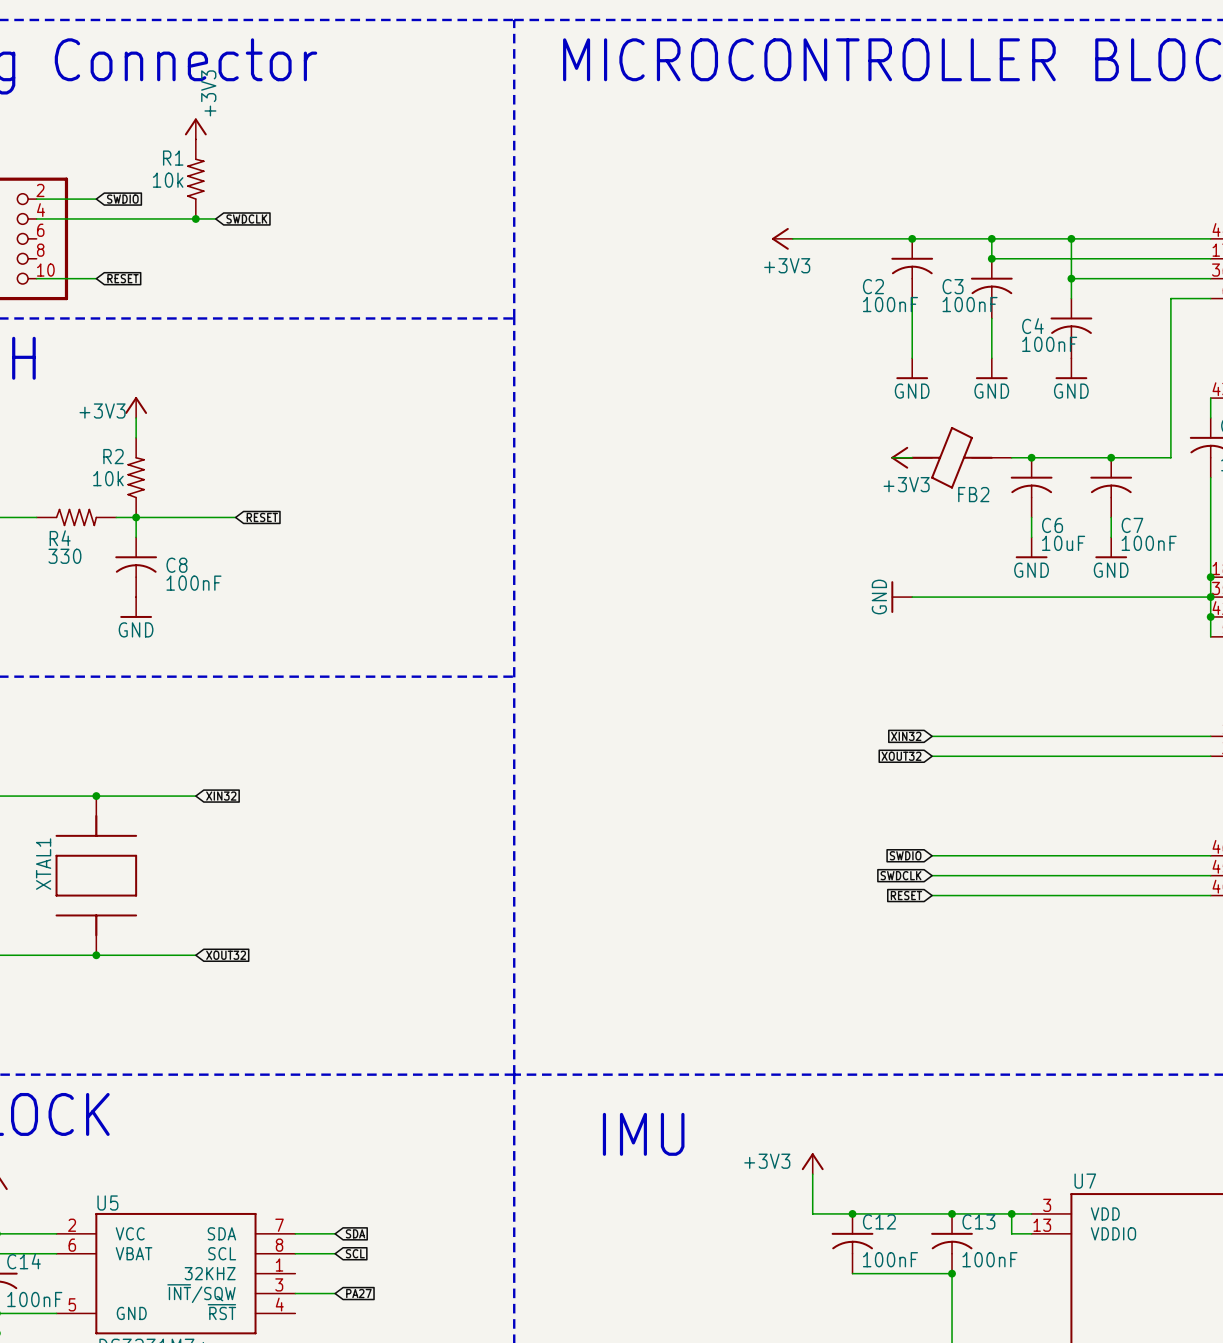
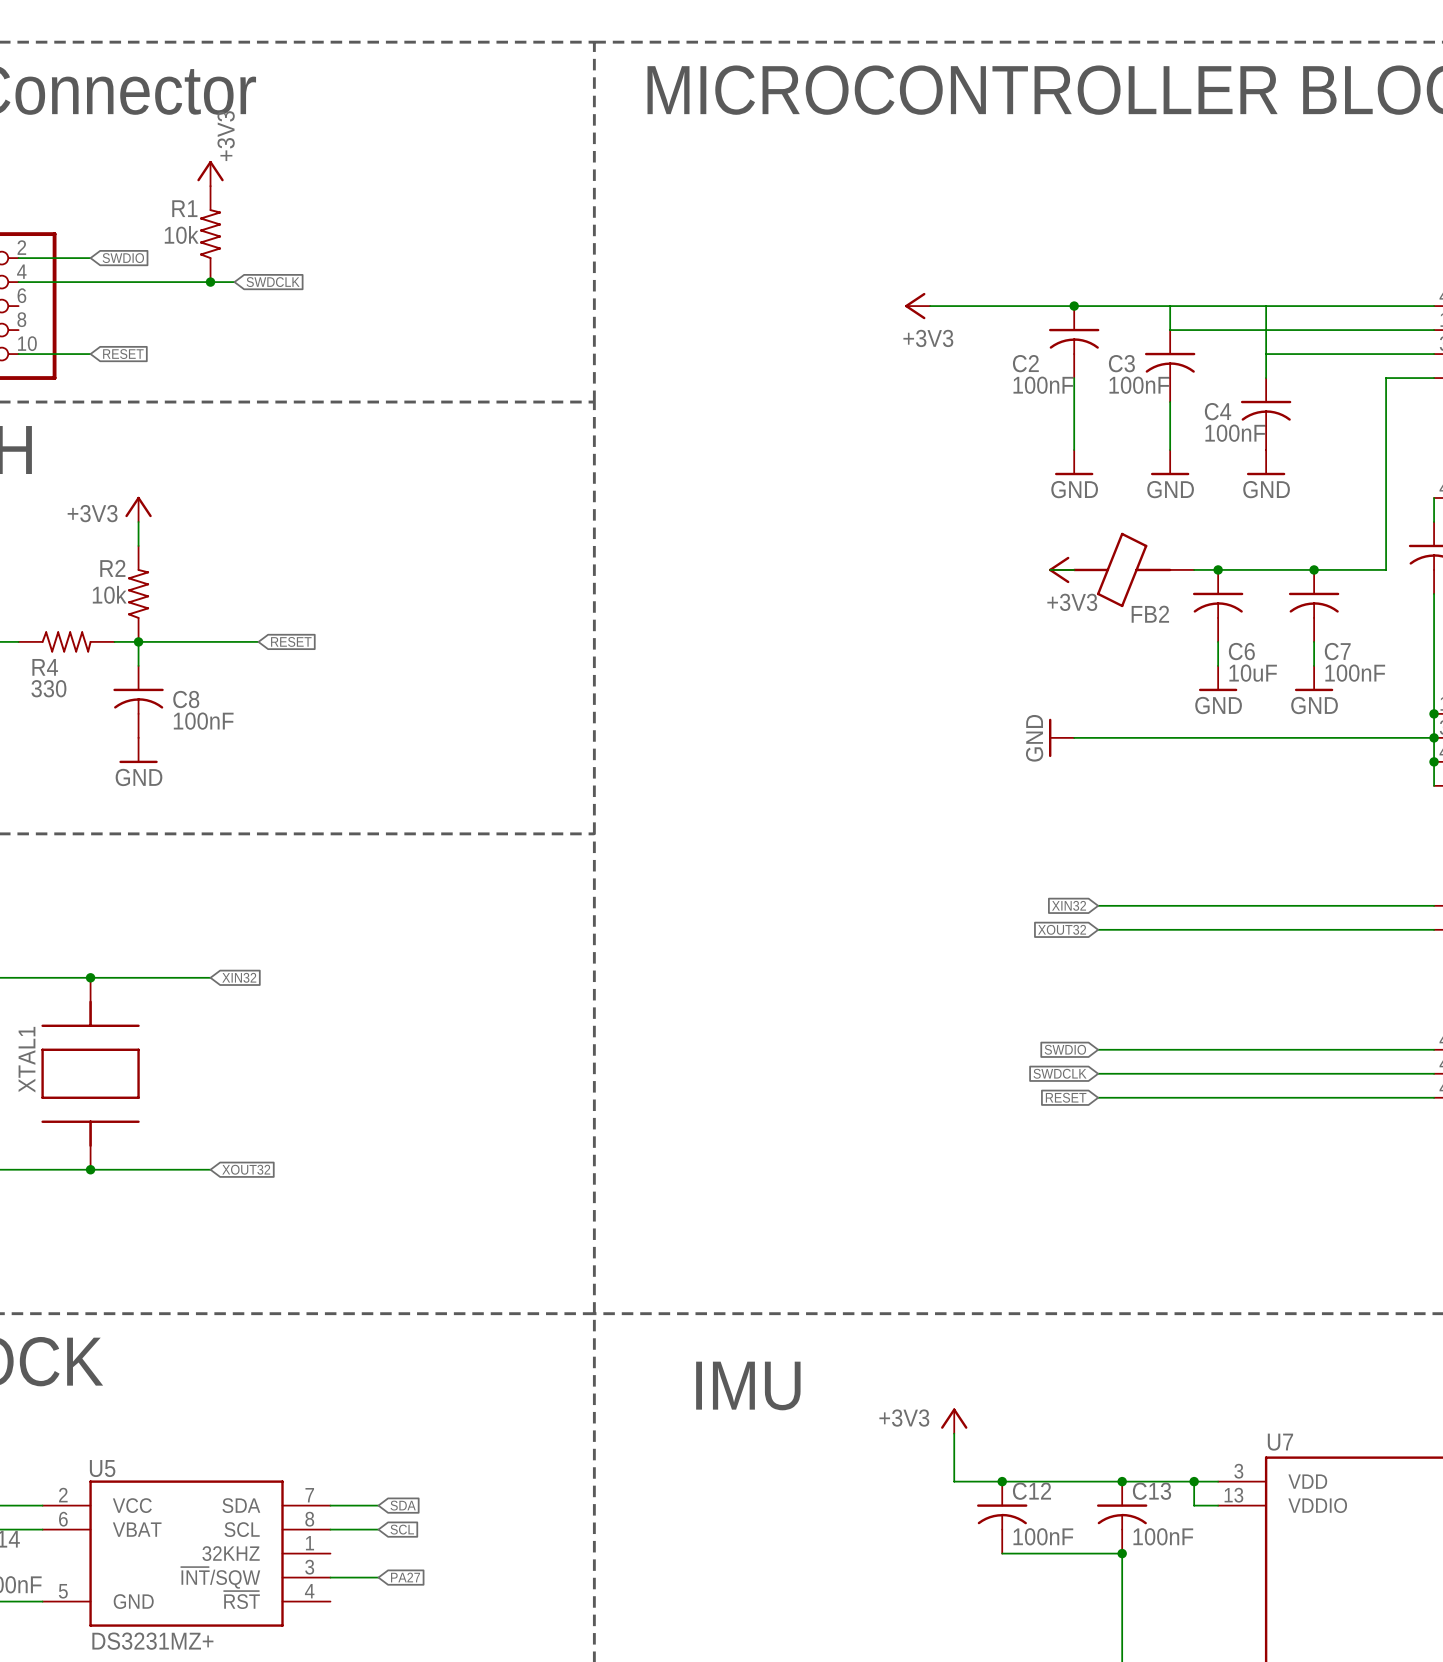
junction: (991, 238) -> none
junction: (1071, 238) -> none
junction: (991, 258) -> none
junction: (1071, 278) -> none

